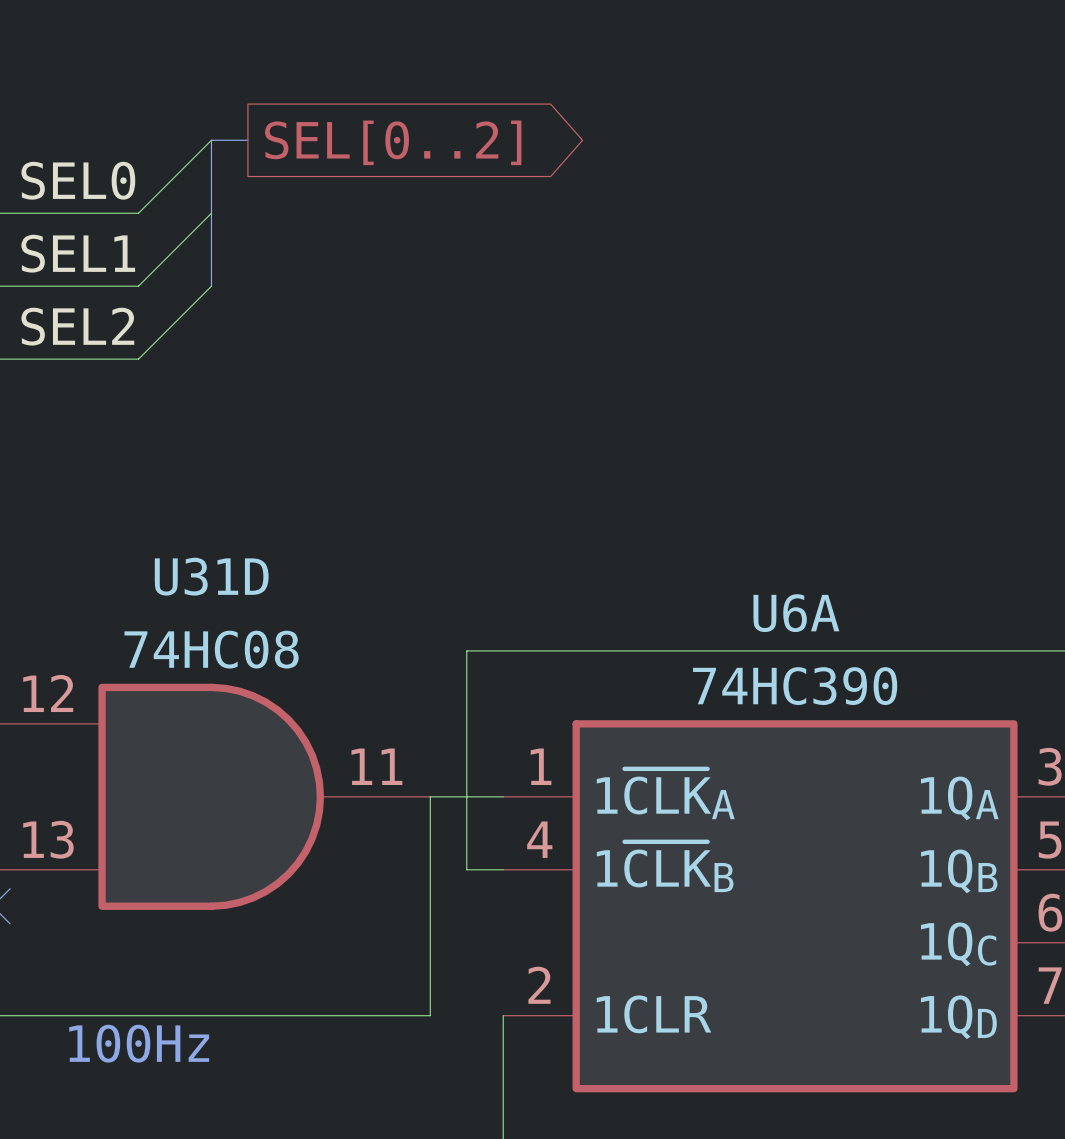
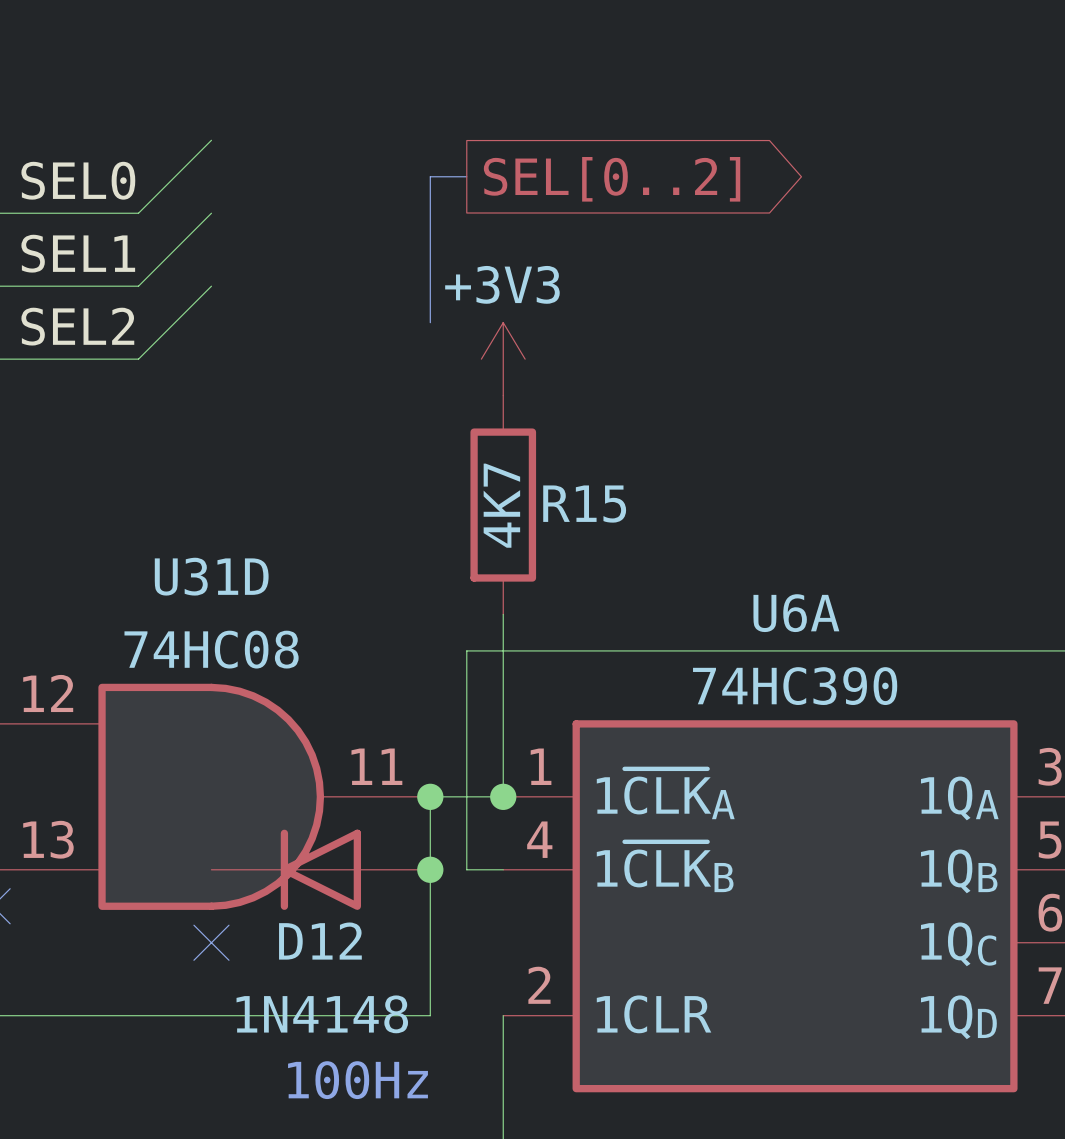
bus: (247, 140) (211, 140) (211, 286) -> (466, 176) (430, 176) (430, 322)
global label position: SEL[0..2] (393, 142) -> SEL[0..2] (612, 179)
power symbol: none -> +3V3 (503, 359)
R15: none -> 4K7 (503, 505)
wire: none -> (503, 614) (503, 796)
junction: none -> (430, 796)
junction: none -> (503, 796)
D12: none -> 1N4148 (320, 869)
junction: none -> (430, 869)
no-connect mark: none -> (211, 942)
text position: 100Hz (139, 1043) -> 100Hz (358, 1080)

